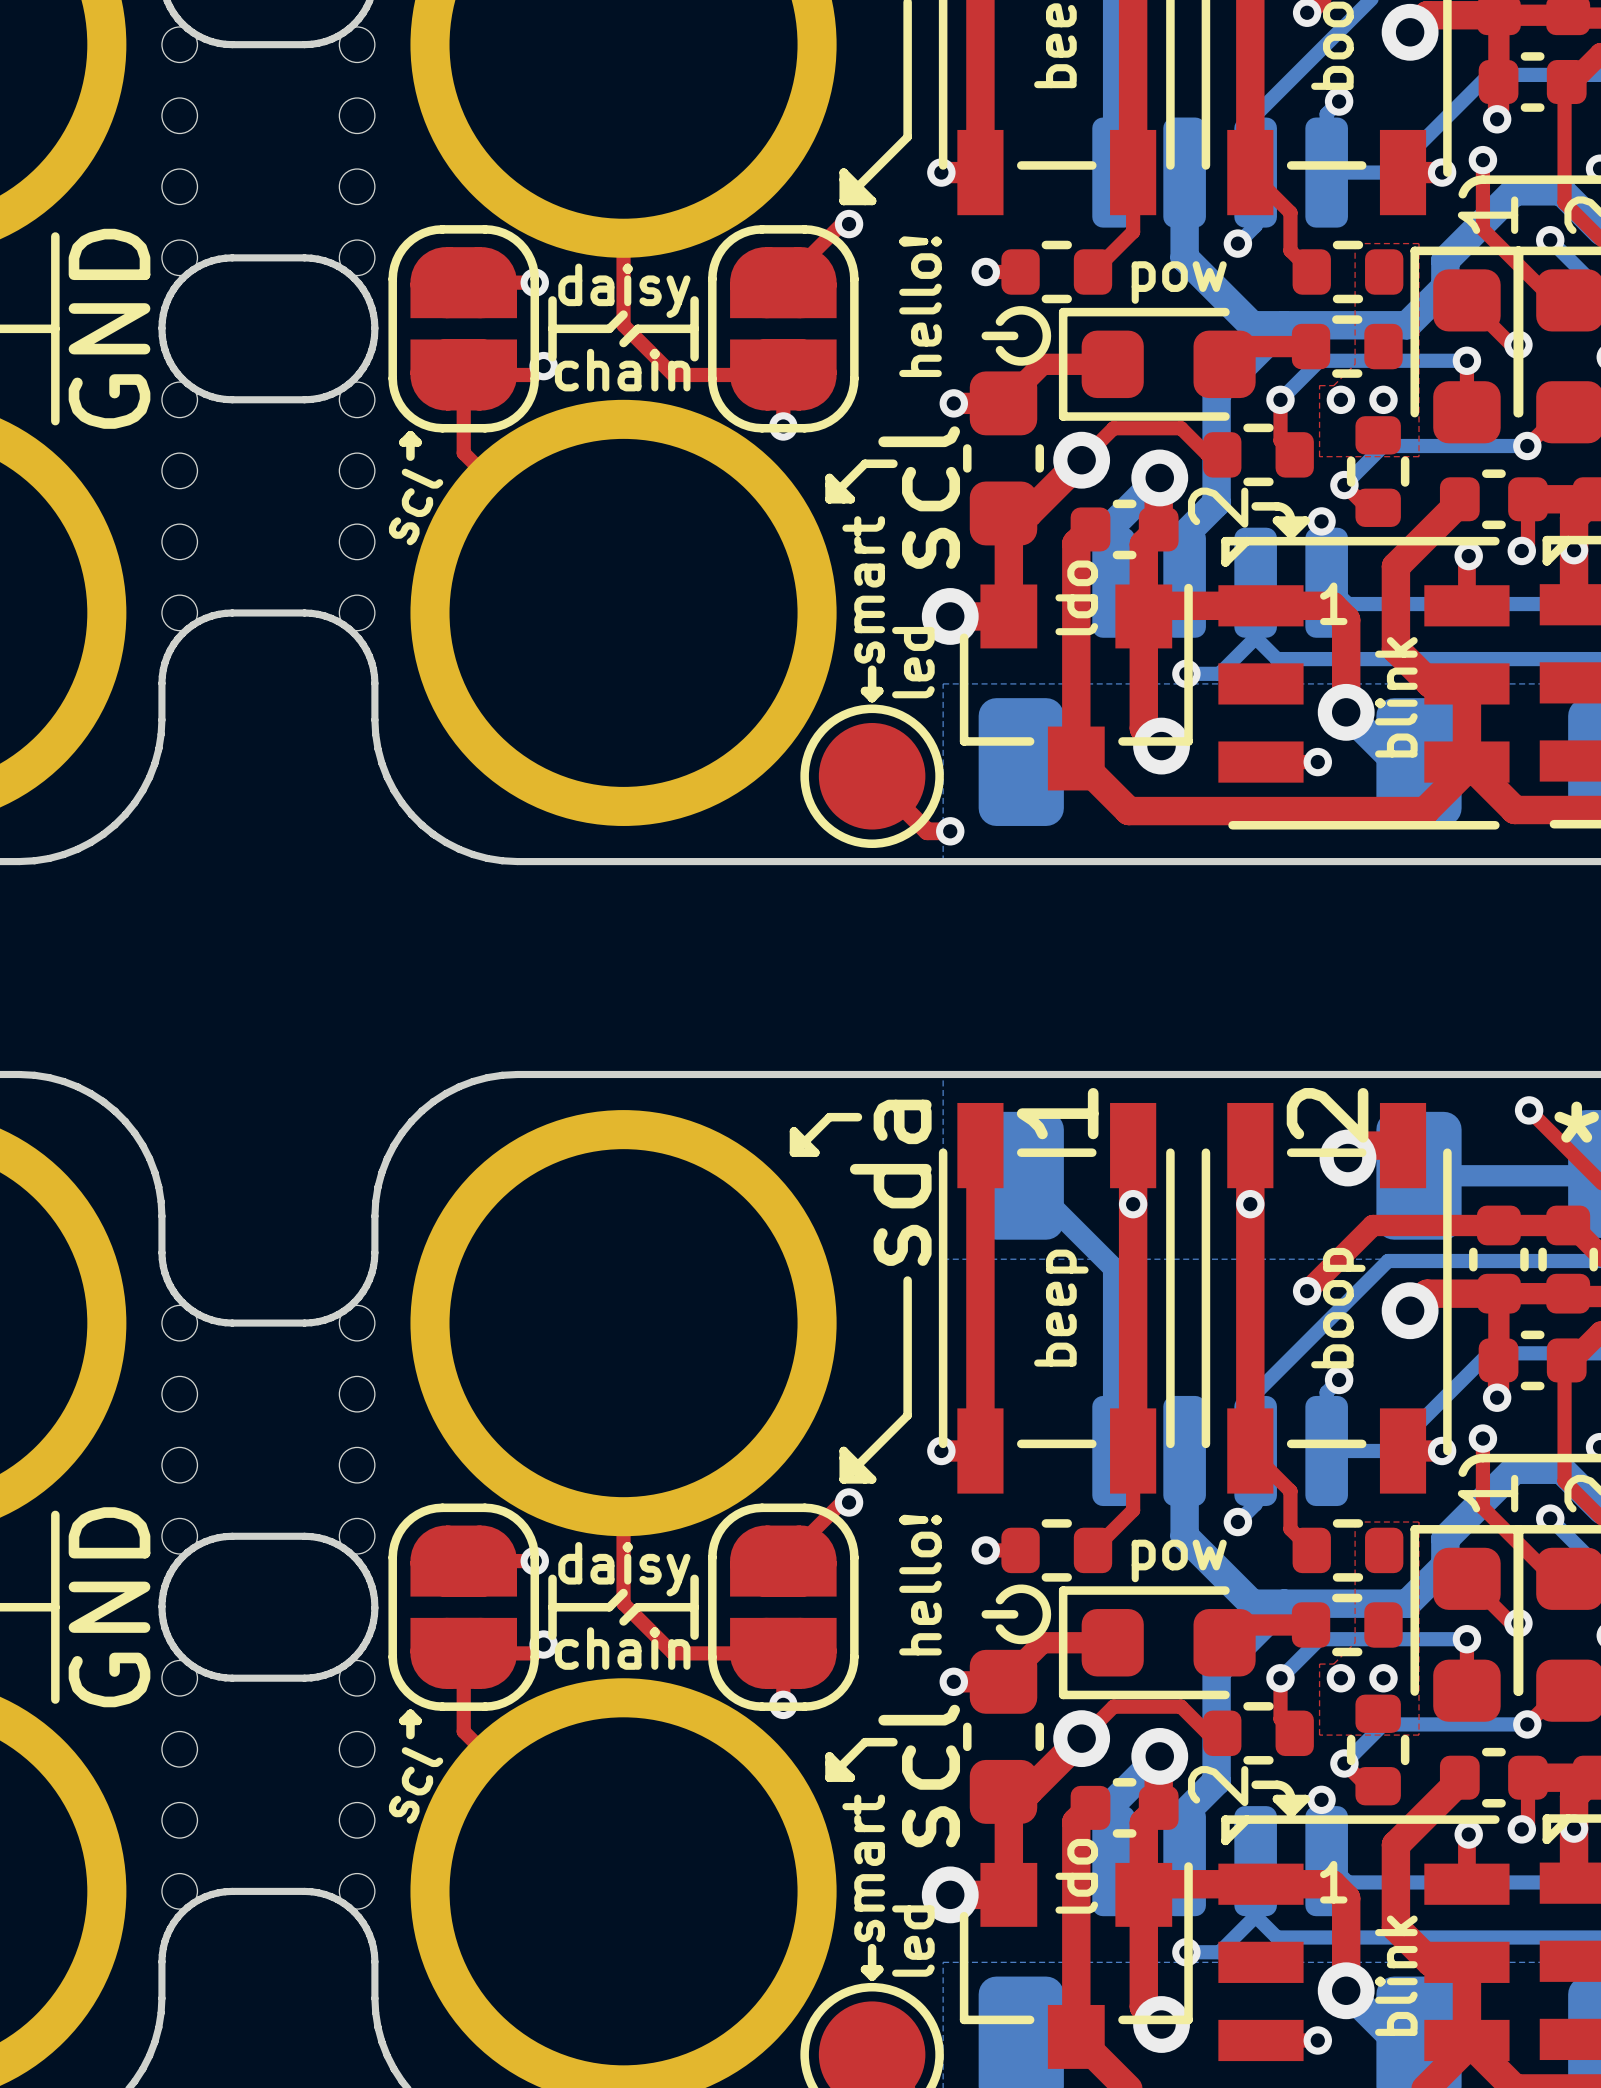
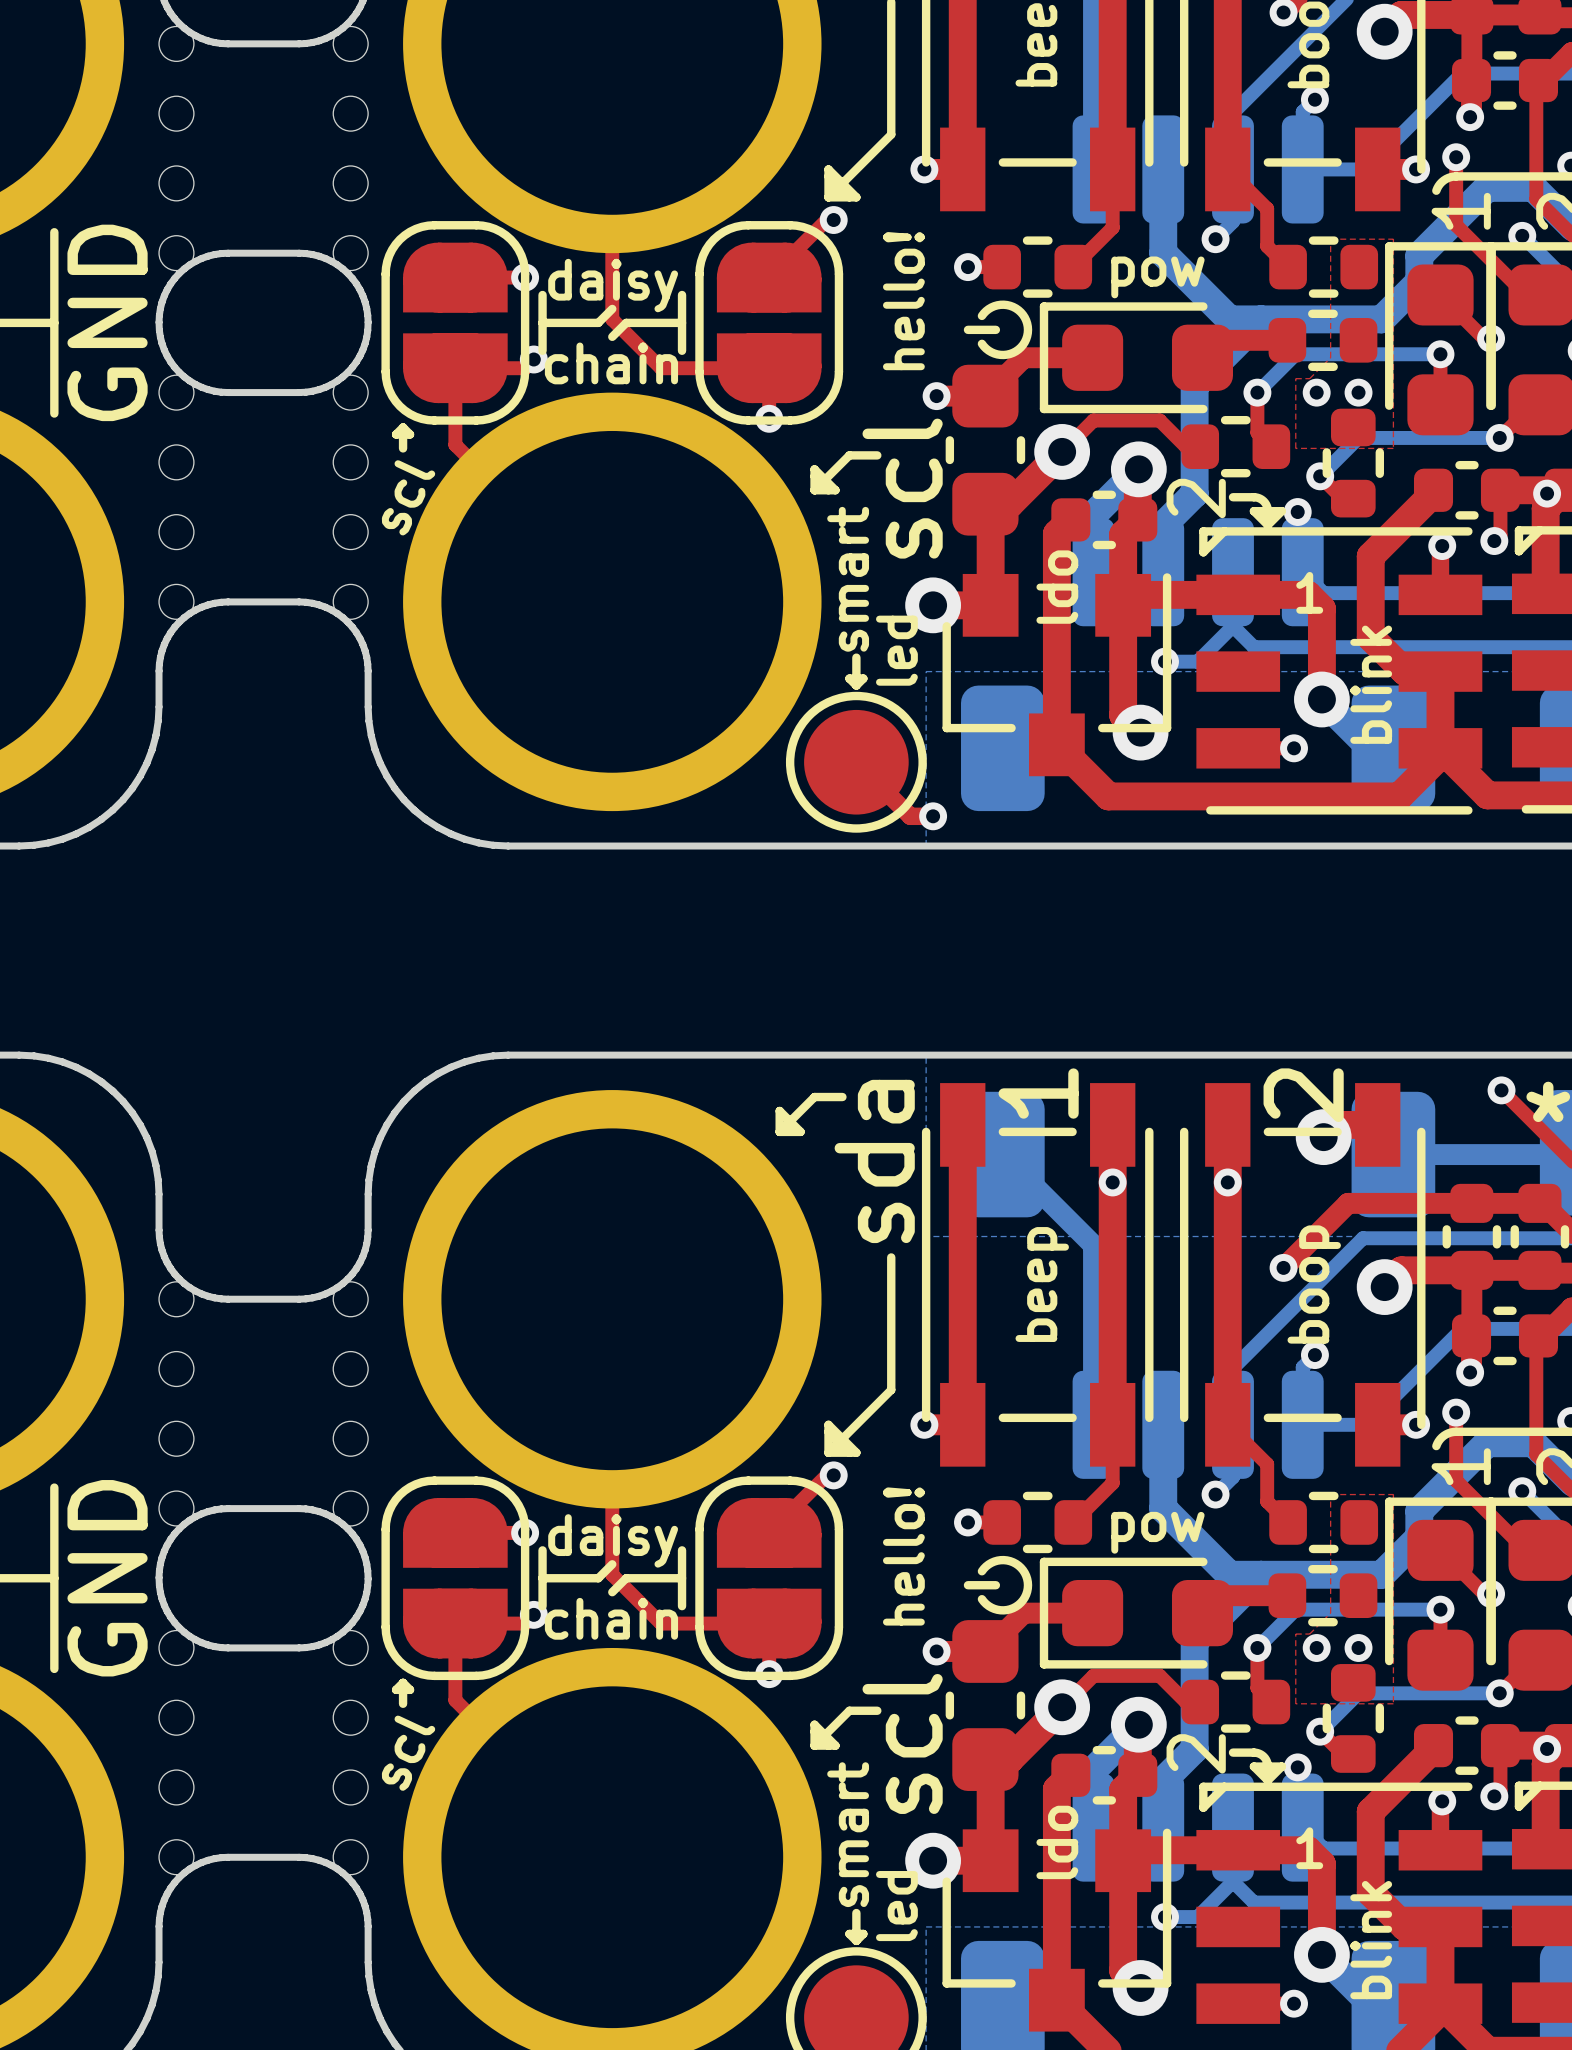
via position: (1574, 550) -> (1547, 493)
via position: (1574, 1828) -> (1547, 1748)

